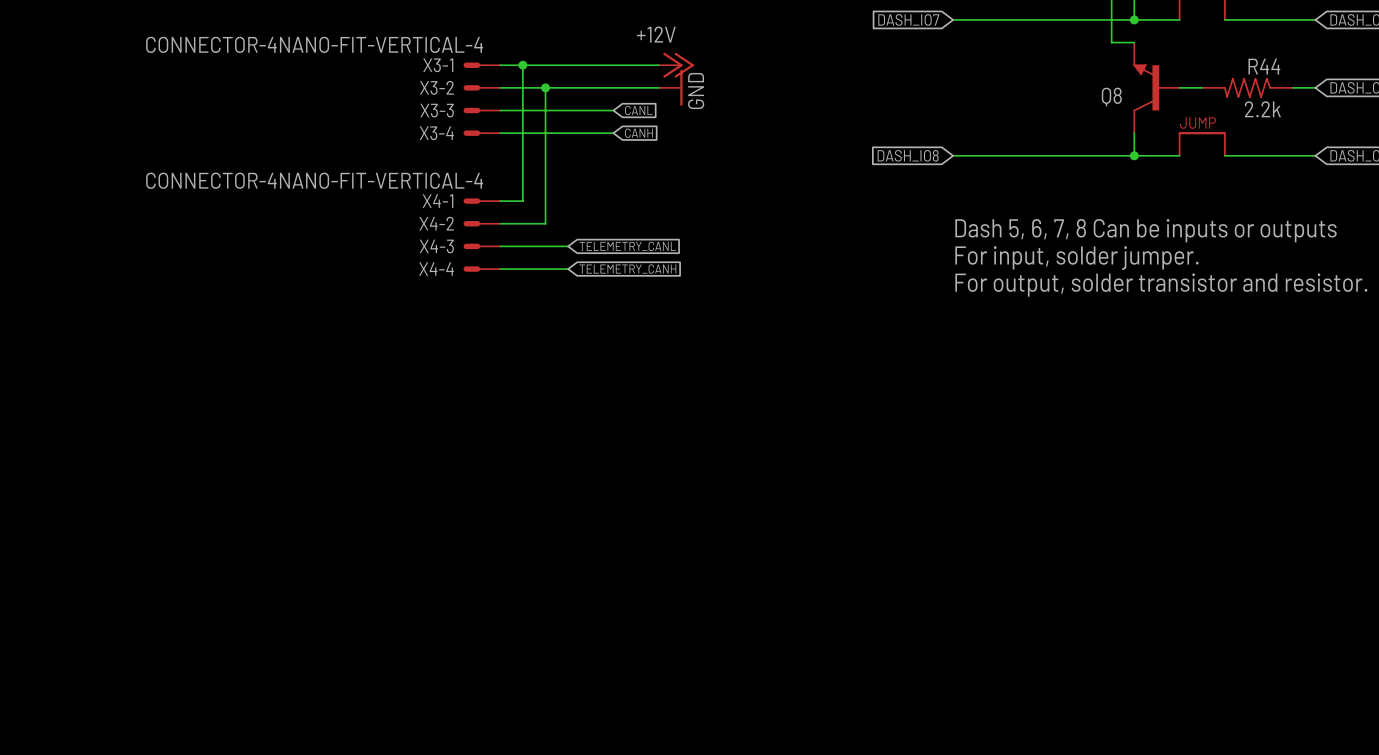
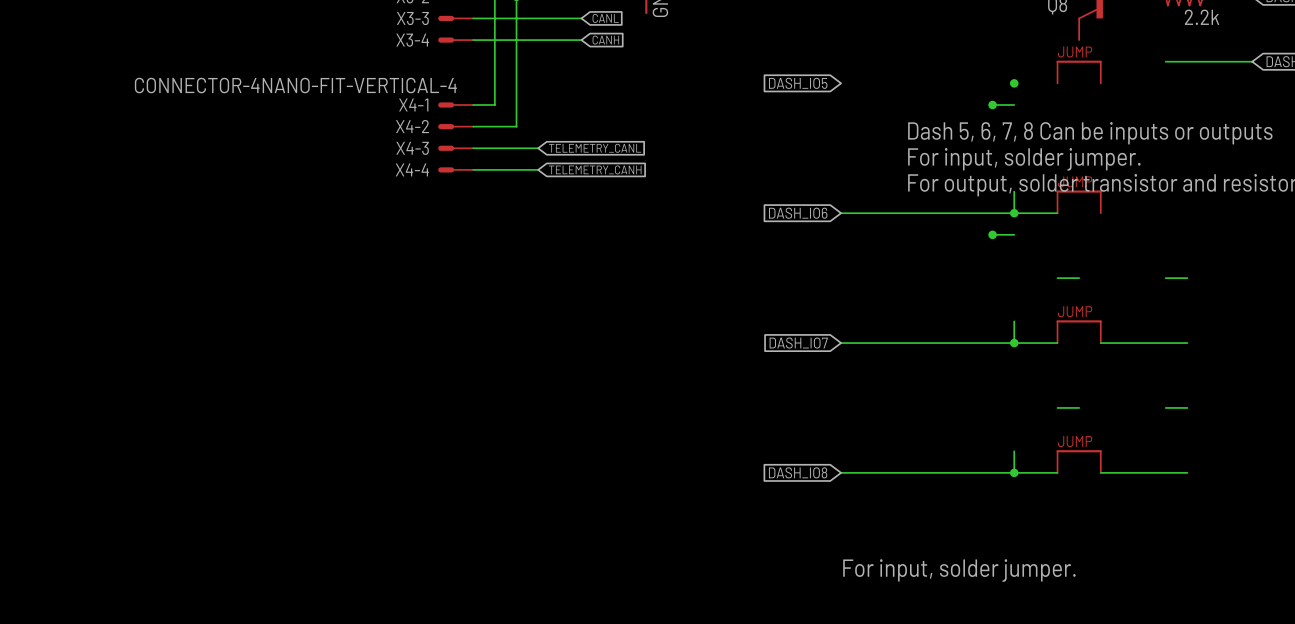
wire: (1134, 133) (1134, 155) -> (1014, 191) (1014, 213)
part position: (1202, 143) -> (1079, 71)
global label: DASH_IO8 (908, 155) -> DASH_IO5 (798, 83)
wire: (953, 155) (1179, 155) -> (841, 213) (1057, 213)
junction: (1134, 155) -> none
junction: none -> (1014, 83)
wire: none -> (992, 104) (1014, 104)
junction: none -> (992, 104)
part: none -> (1079, 201)
global label: none -> DASH_IO6 (798, 213)
junction: none -> (1014, 213)
wire: none -> (992, 234) (1014, 234)
junction: none -> (992, 234)
wire: none -> (1057, 278) (1079, 278)
wire: none -> (1165, 278) (1187, 278)
wire: none -> (1014, 321) (1014, 343)
part: none -> (1079, 331)
global label: none -> DASH_IO7 (798, 343)
wire: none -> (841, 343) (1057, 343)
junction: none -> (1014, 343)
wire: none -> (1100, 343) (1187, 343)
wire: none -> (1057, 407) (1079, 407)
wire: none -> (1165, 407) (1187, 407)
wire: none -> (1014, 451) (1014, 472)
part: none -> (1079, 461)
global label: none -> DASH_IO8 (798, 472)
wire: none -> (841, 472) (1057, 472)
junction: none -> (1014, 472)
wire: none -> (1100, 472) (1187, 472)
text: none -> For input, solder jumper. (959, 570)

